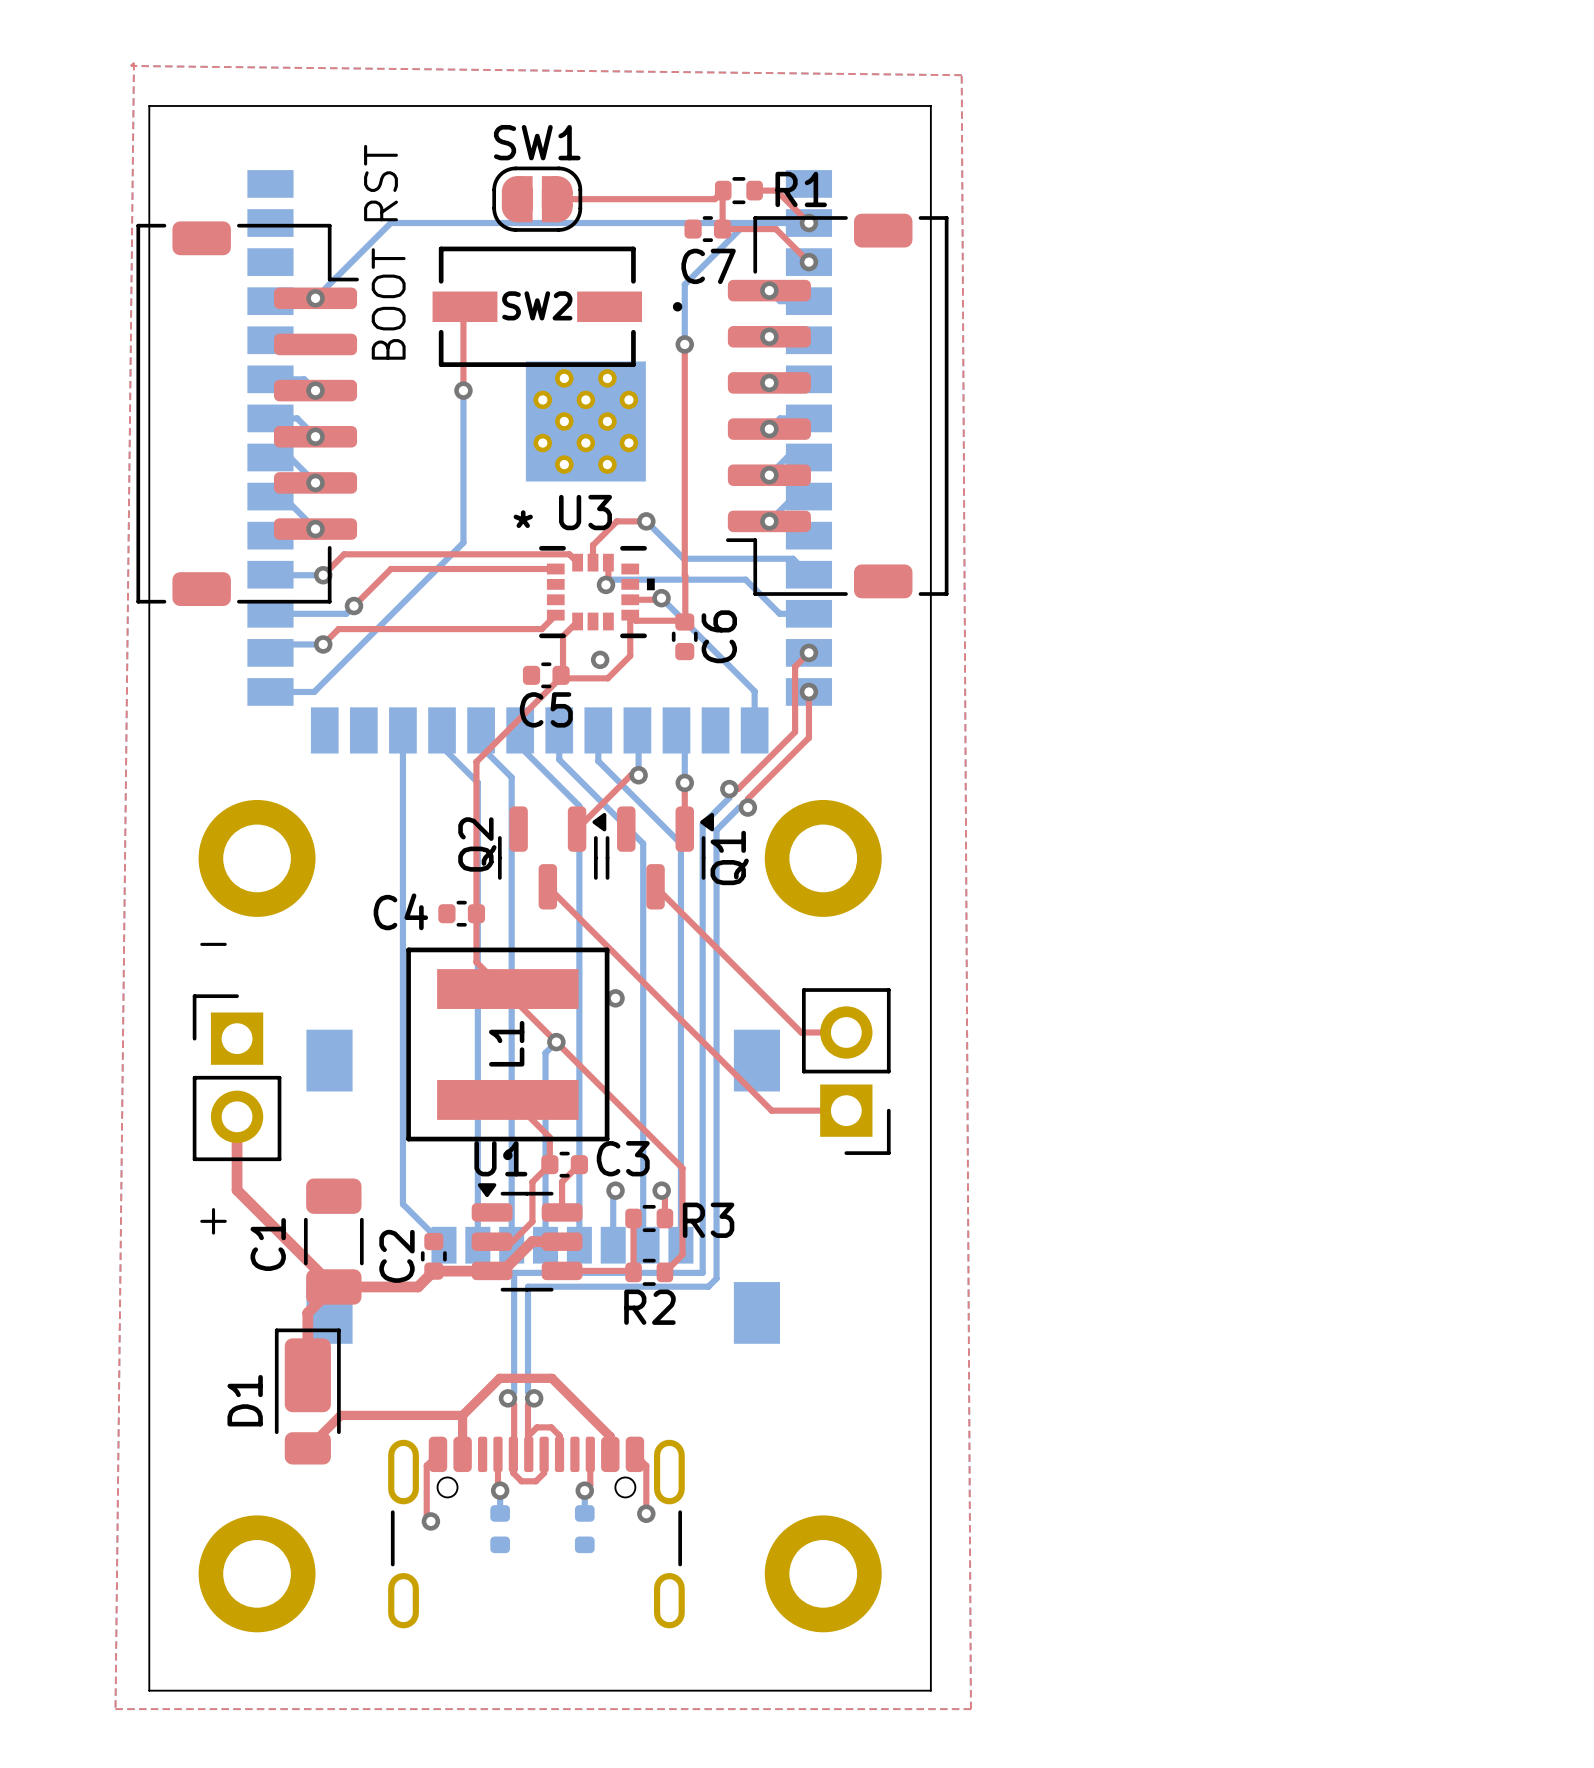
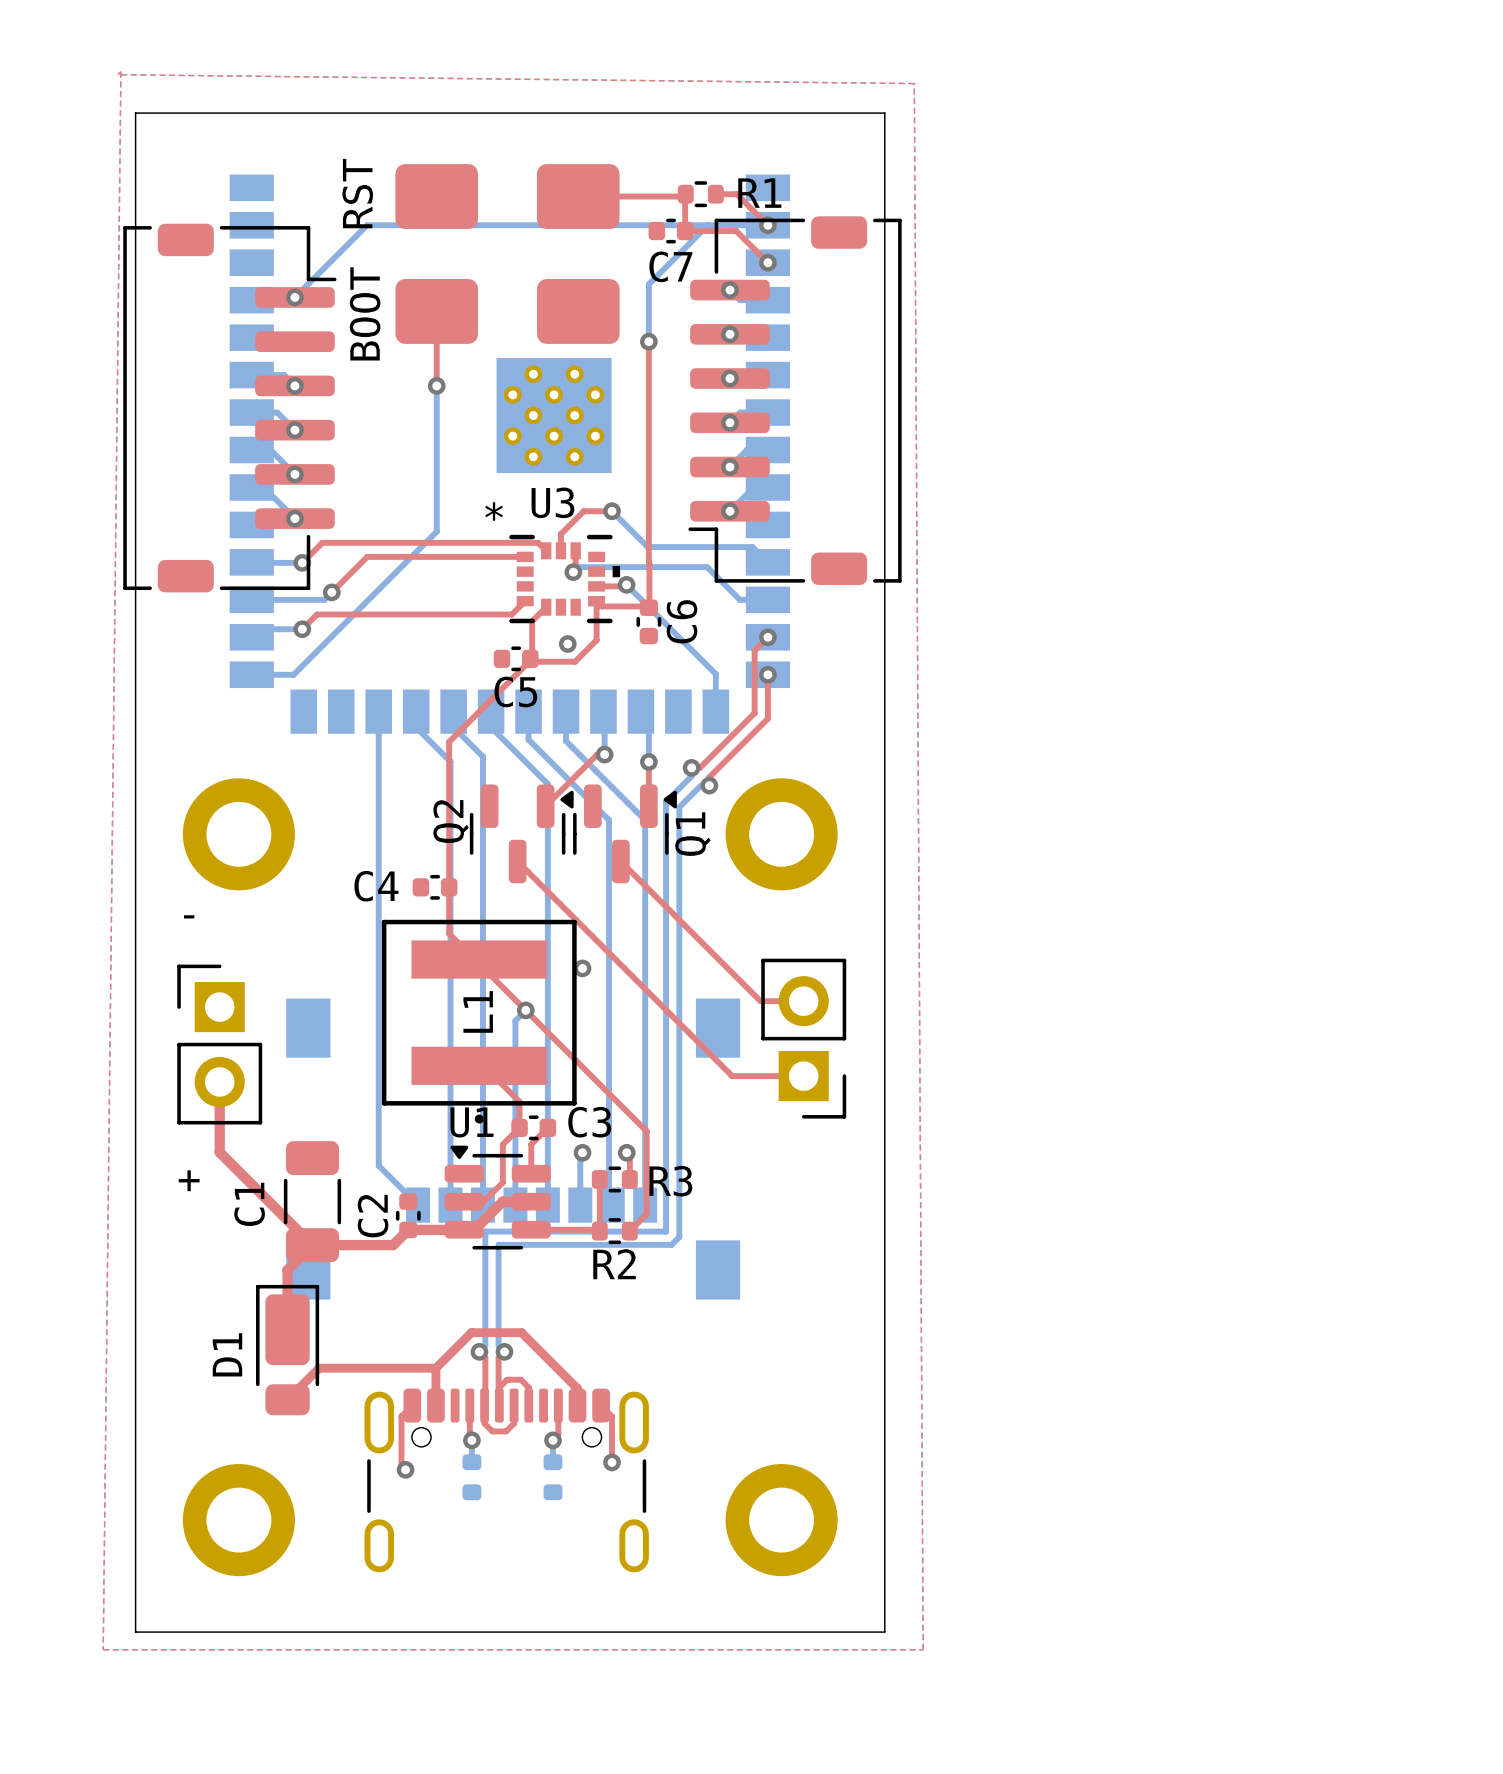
part: none -> (507, 196)
top track: (720, 193) (714, 199) (557, 199) -> (683, 196) (578, 196)
SW1: (537, 199) -> none
SW2: (557, 306) -> none
part: none -> (507, 311)

